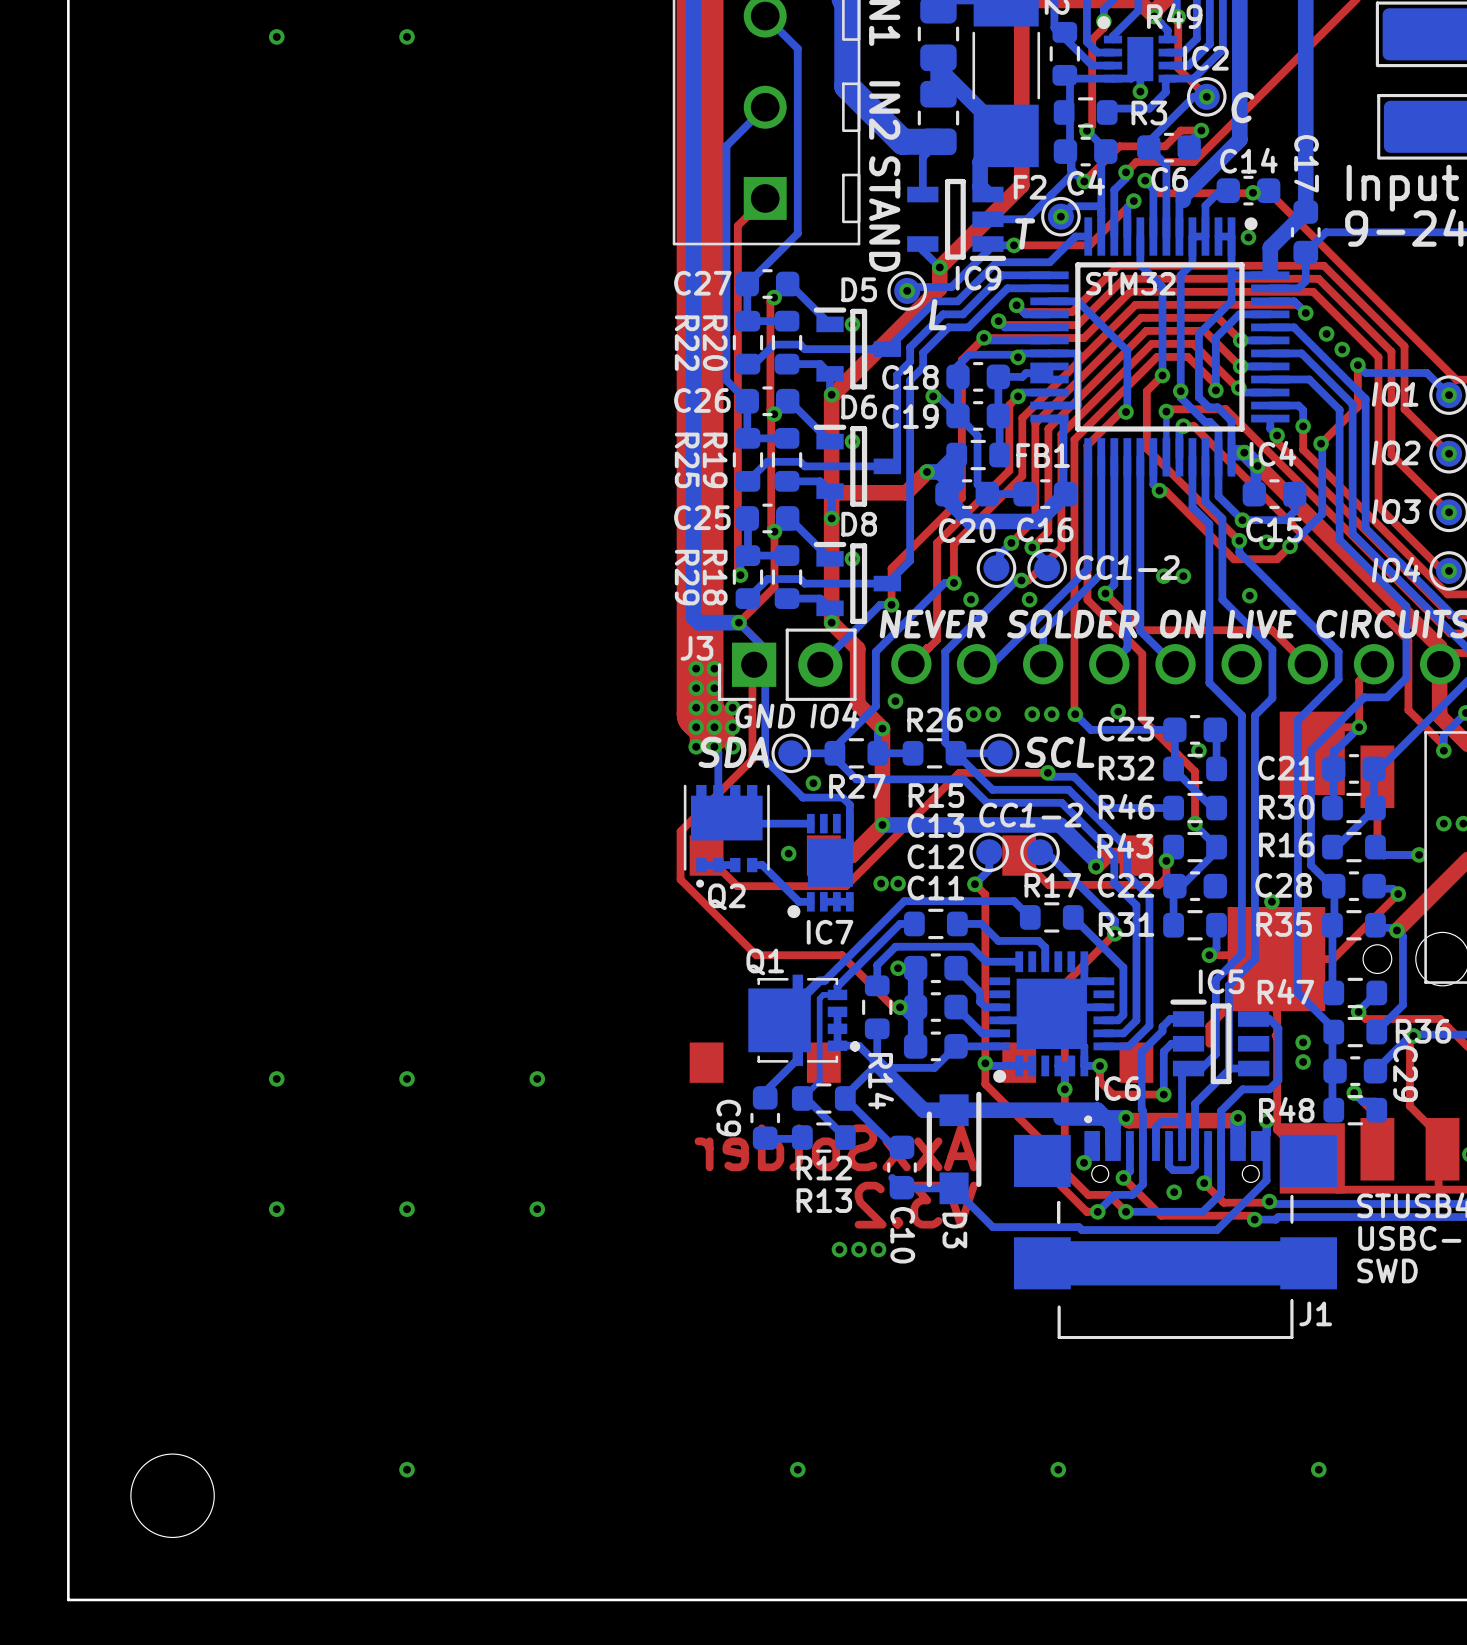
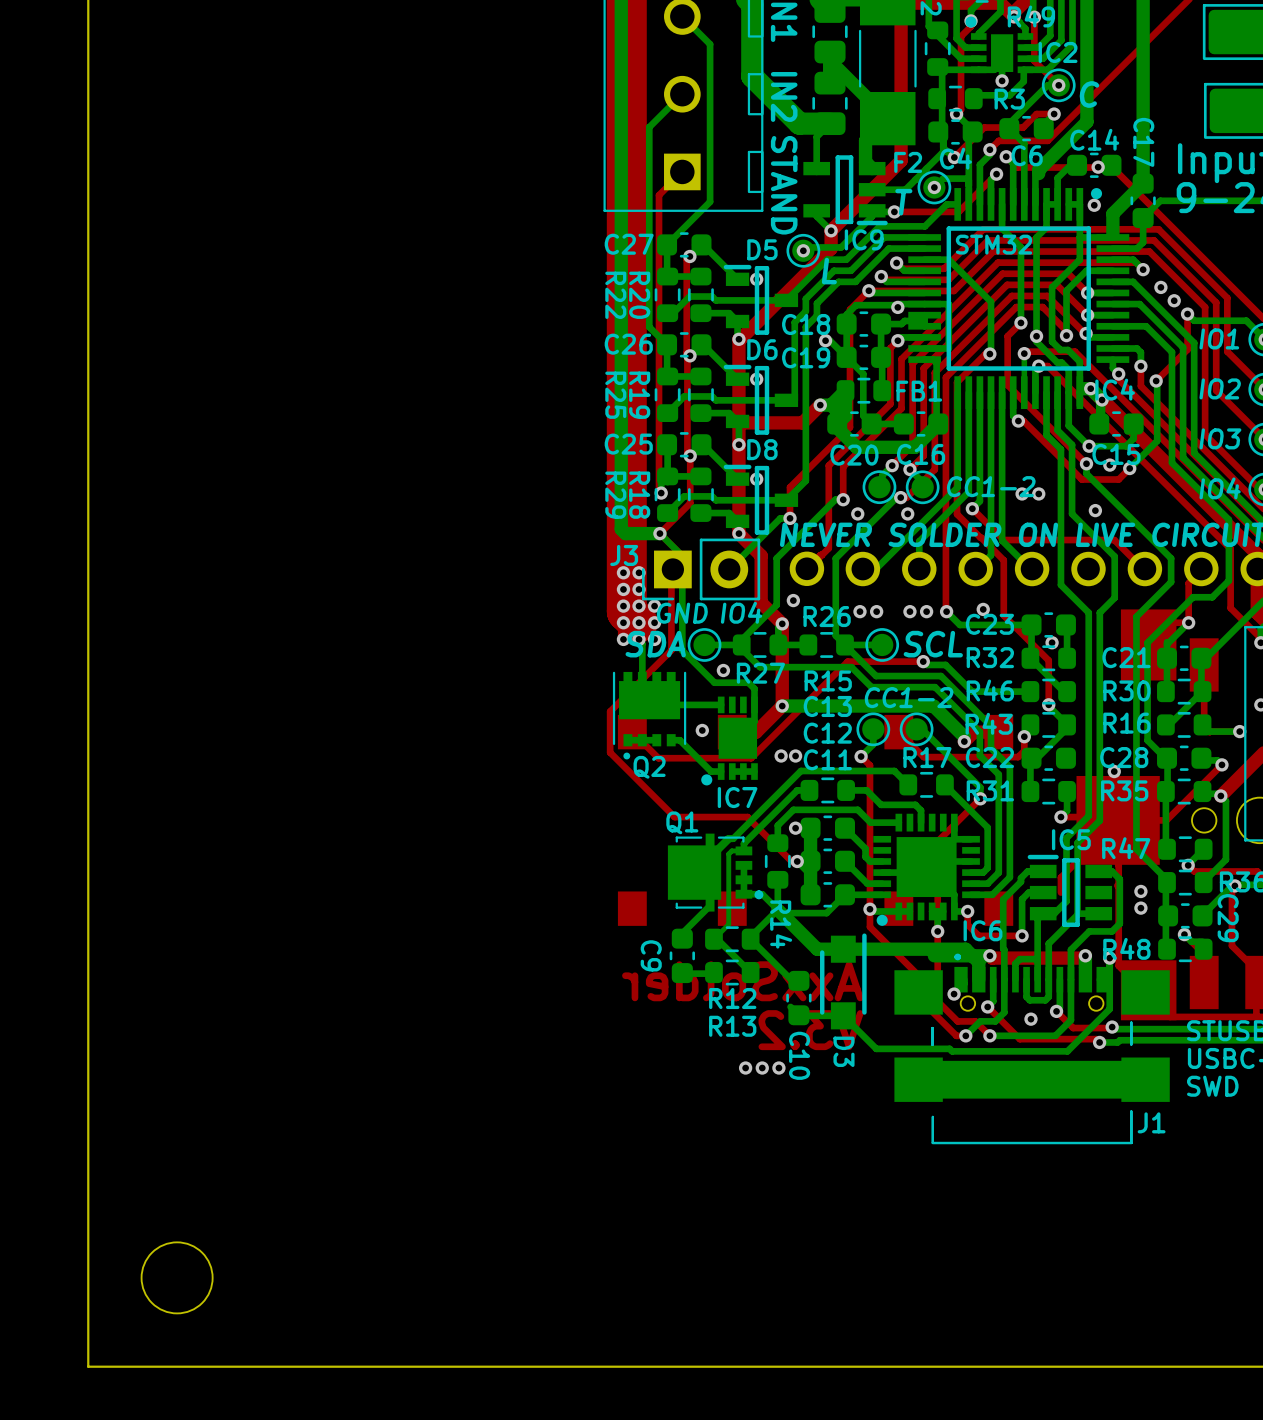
via: (276, 36) -> none
via: (407, 36) -> none
via: (276, 1078) -> none
via: (407, 1078) -> none
via: (537, 1078) -> none
via: (276, 1209) -> none
via: (407, 1209) -> none
via: (537, 1209) -> none
via: (407, 1469) -> none
via: (797, 1469) -> none
via: (1058, 1469) -> none
via: (1318, 1469) -> none

